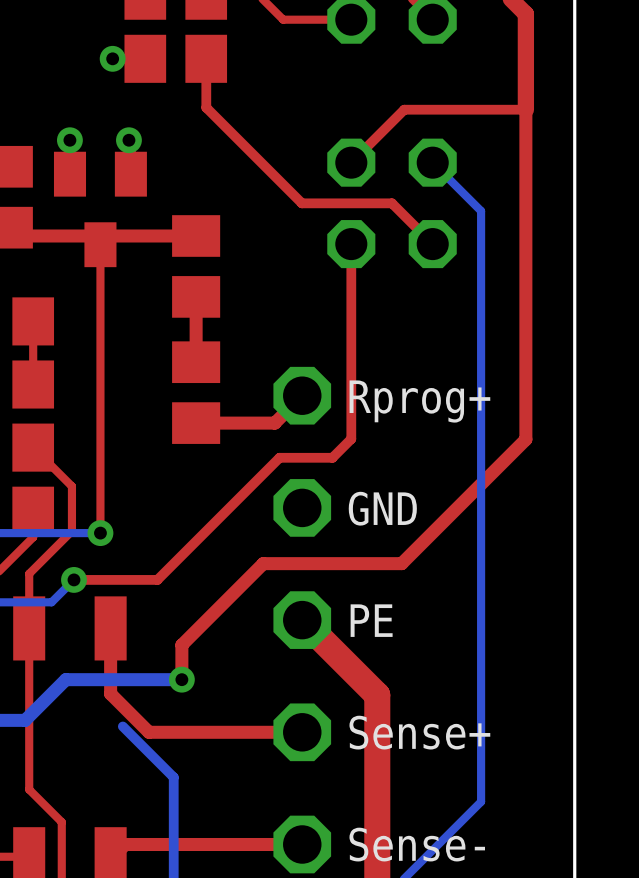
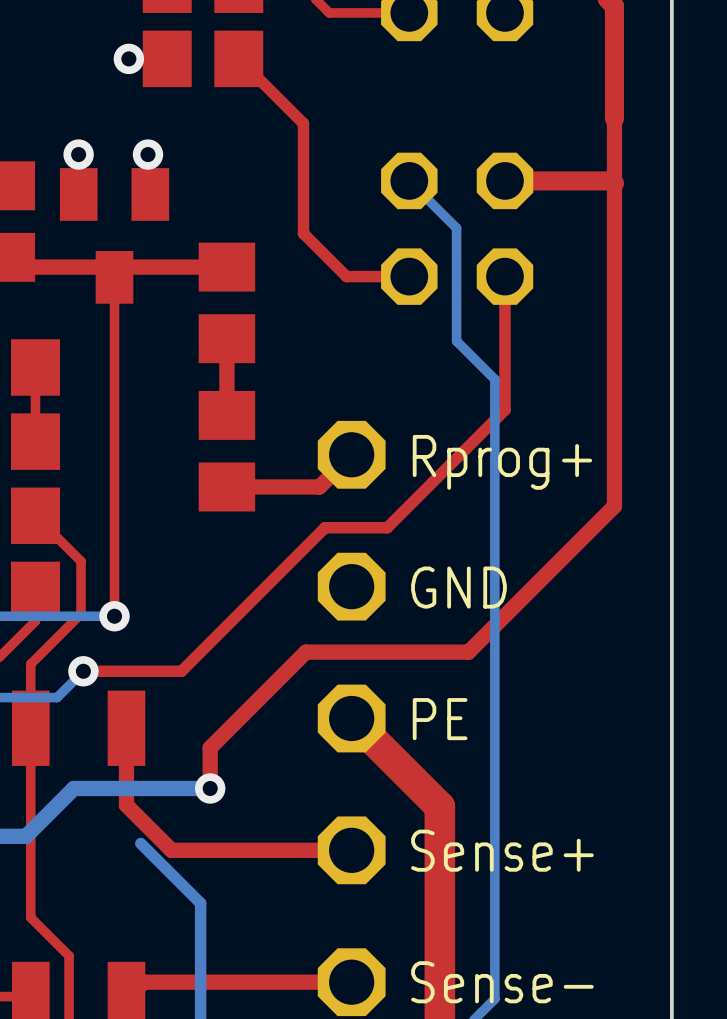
top track: (206, 58) (206, 107) (301, 203) (391, 203) (432, 244) -> (238, 58) (303, 123) (303, 233) (346, 276) (409, 276)
top track: (525, 109) (404, 109) (351, 162) -> none
top track: none -> (504, 180) (612, 180) (614, 183)
bottom track: (432, 162) (481, 211) (481, 801) (424, 858) -> (409, 180) (456, 228) (456, 341) (494, 379) (494, 998)
top track: (351, 244) (351, 438) -> (504, 276) (504, 409) (409, 505)

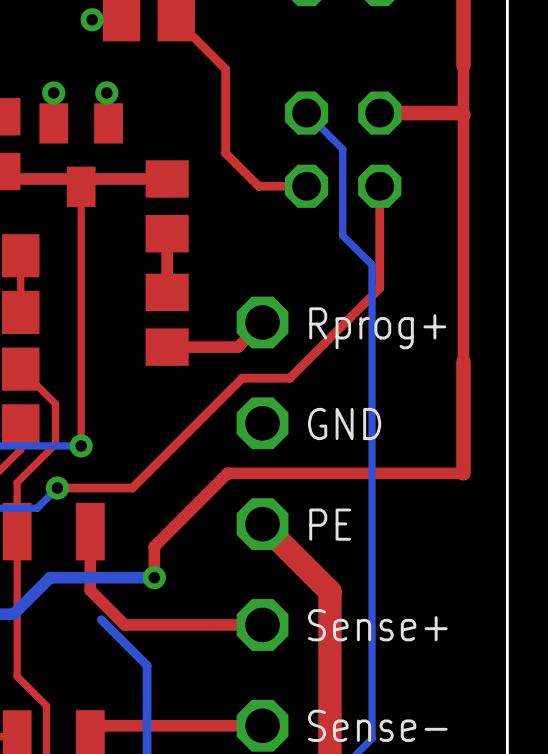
top track: (614, 506) (468, 652) -> (463, 361) (463, 473) (351, 473)

